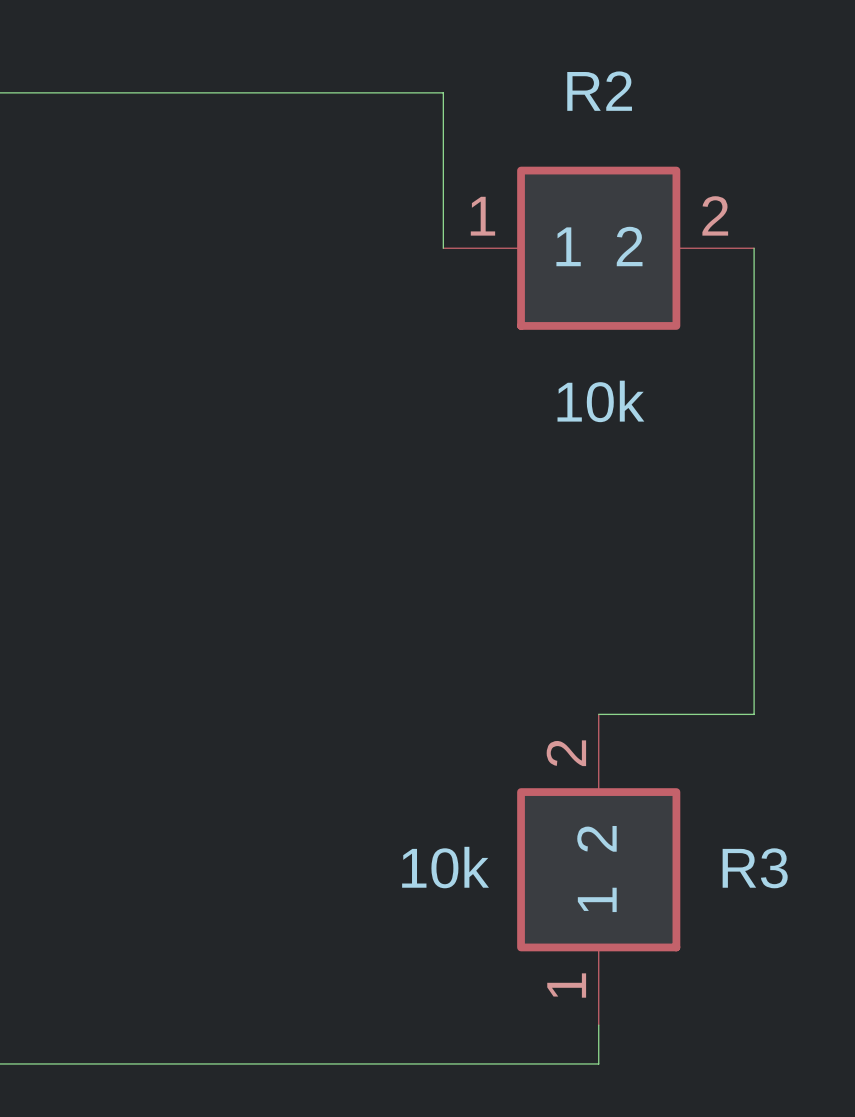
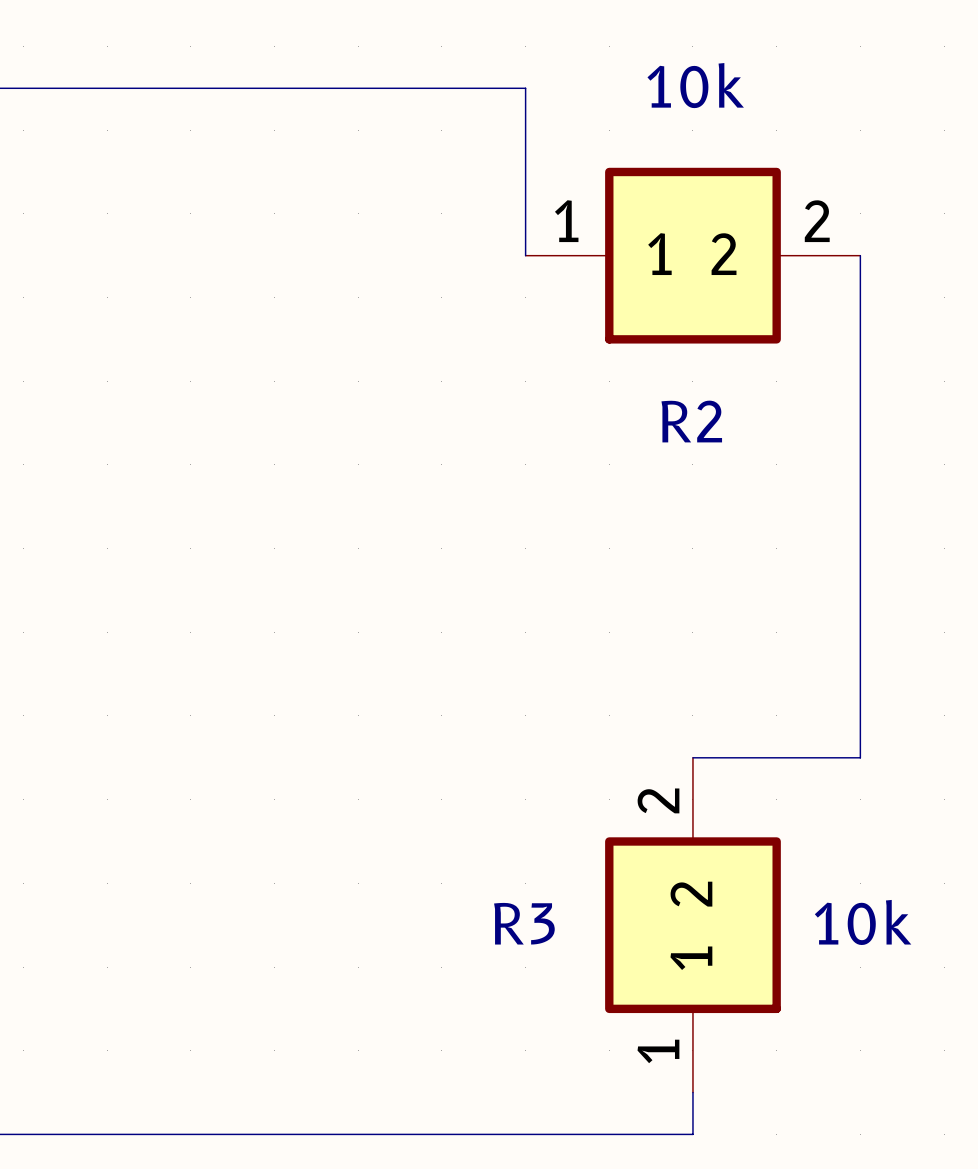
R2 name position: R2 (599, 91) -> R2 (691, 421)
R2 value position: 10k (600, 401) -> 10k (695, 85)
R3 value position: 10k (445, 867) -> 10k (863, 922)
R3 name position: R3 (755, 868) -> R3 (524, 923)

